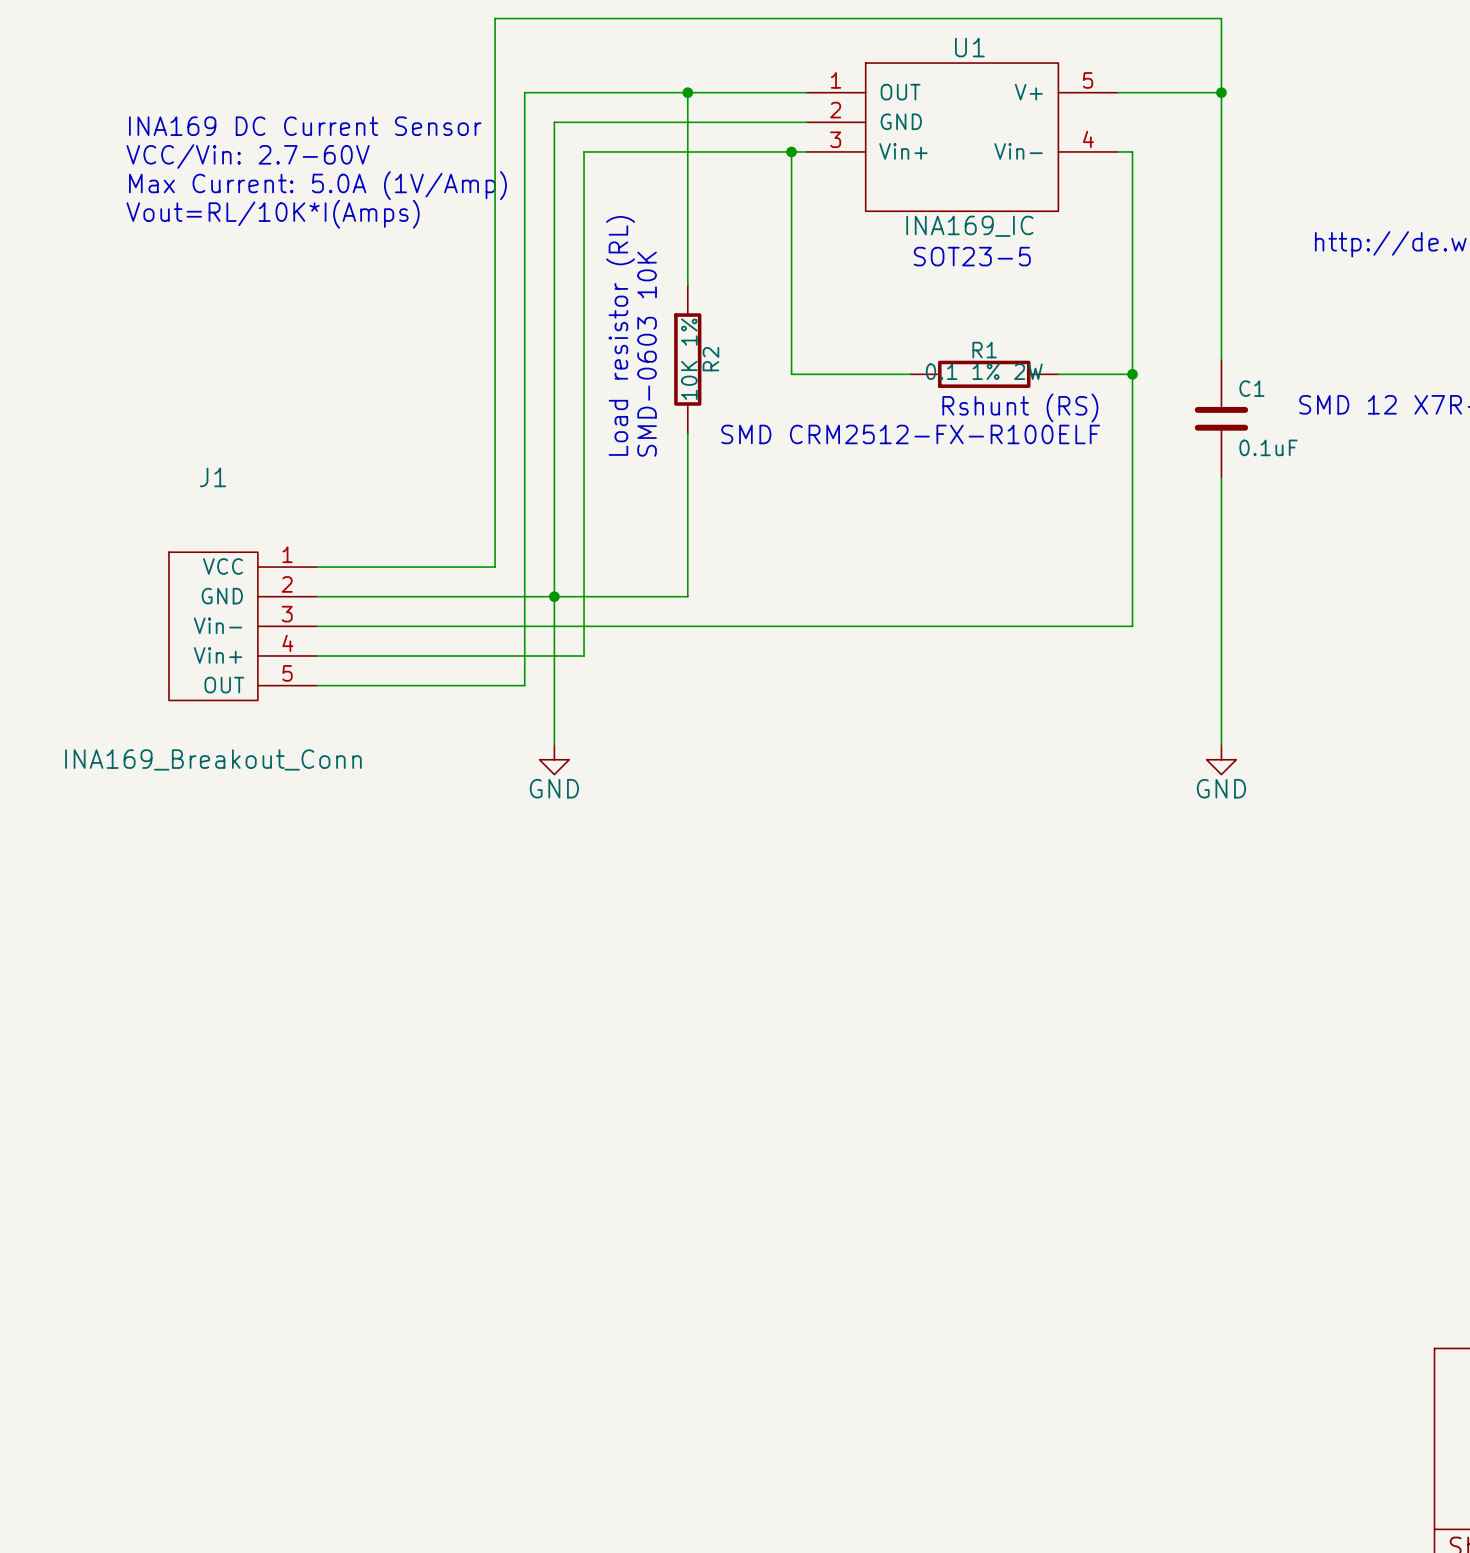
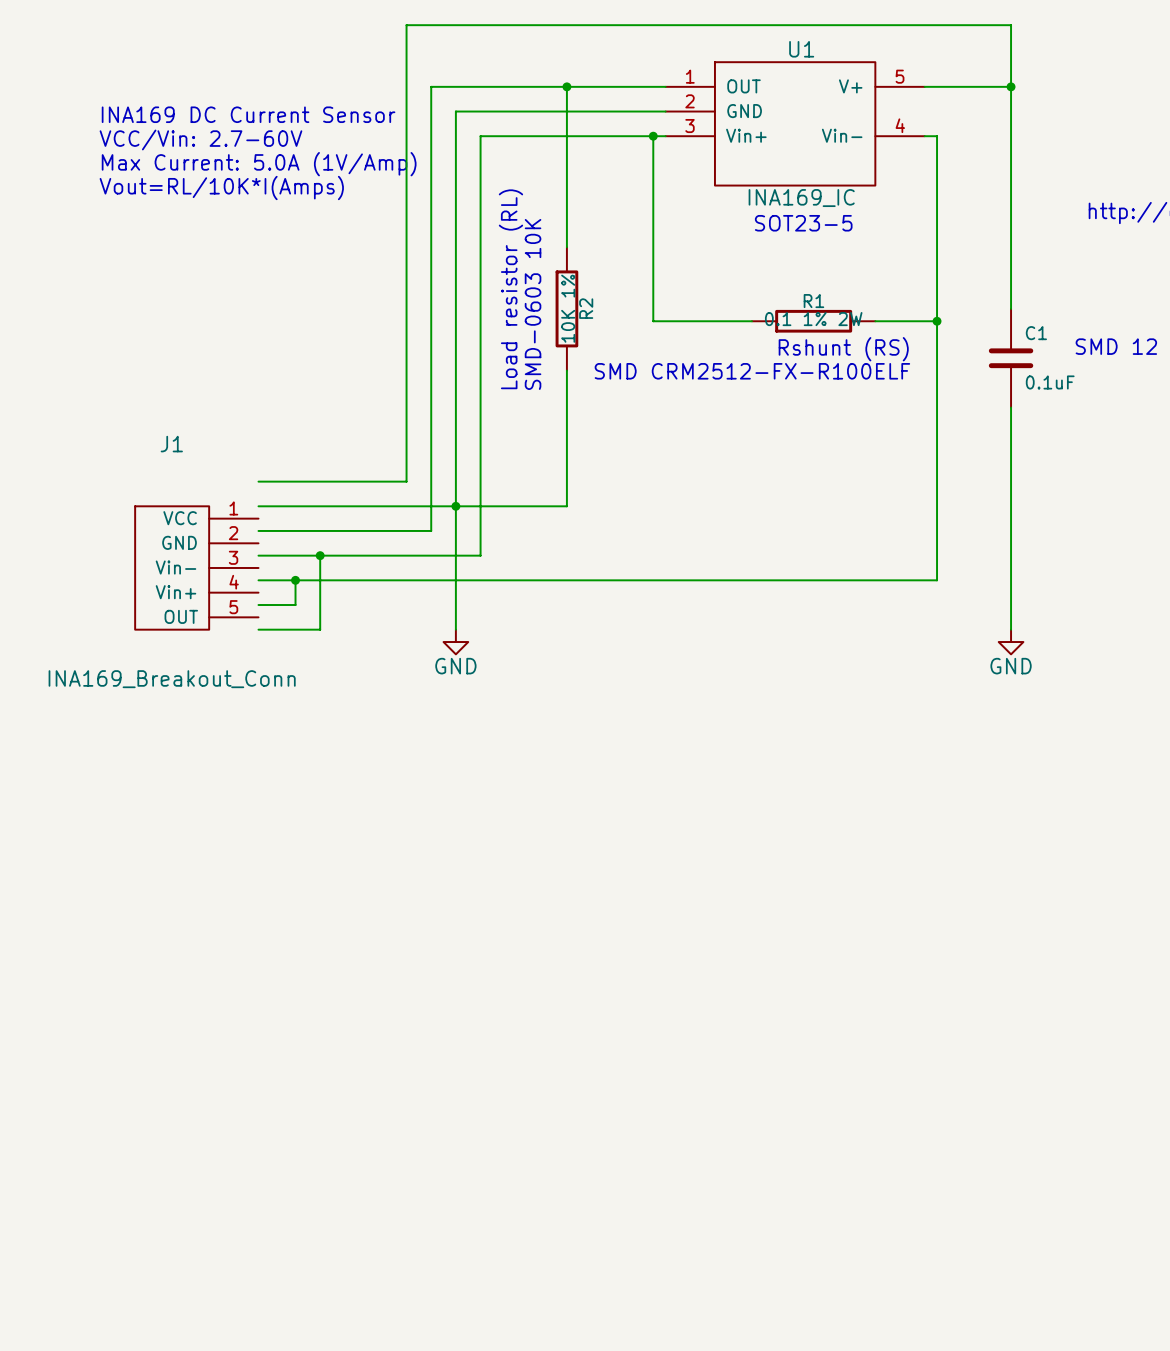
J1 position: (243, 626) -> (196, 567)
wire: (1132, 626) (524, 626) (524, 685) -> (937, 530) (937, 580) (431, 580)
wire: none -> (320, 555) (320, 629) (258, 629)
junction: none -> (320, 555)
wire: none -> (295, 580) (295, 605) (258, 605)
junction: none -> (295, 580)

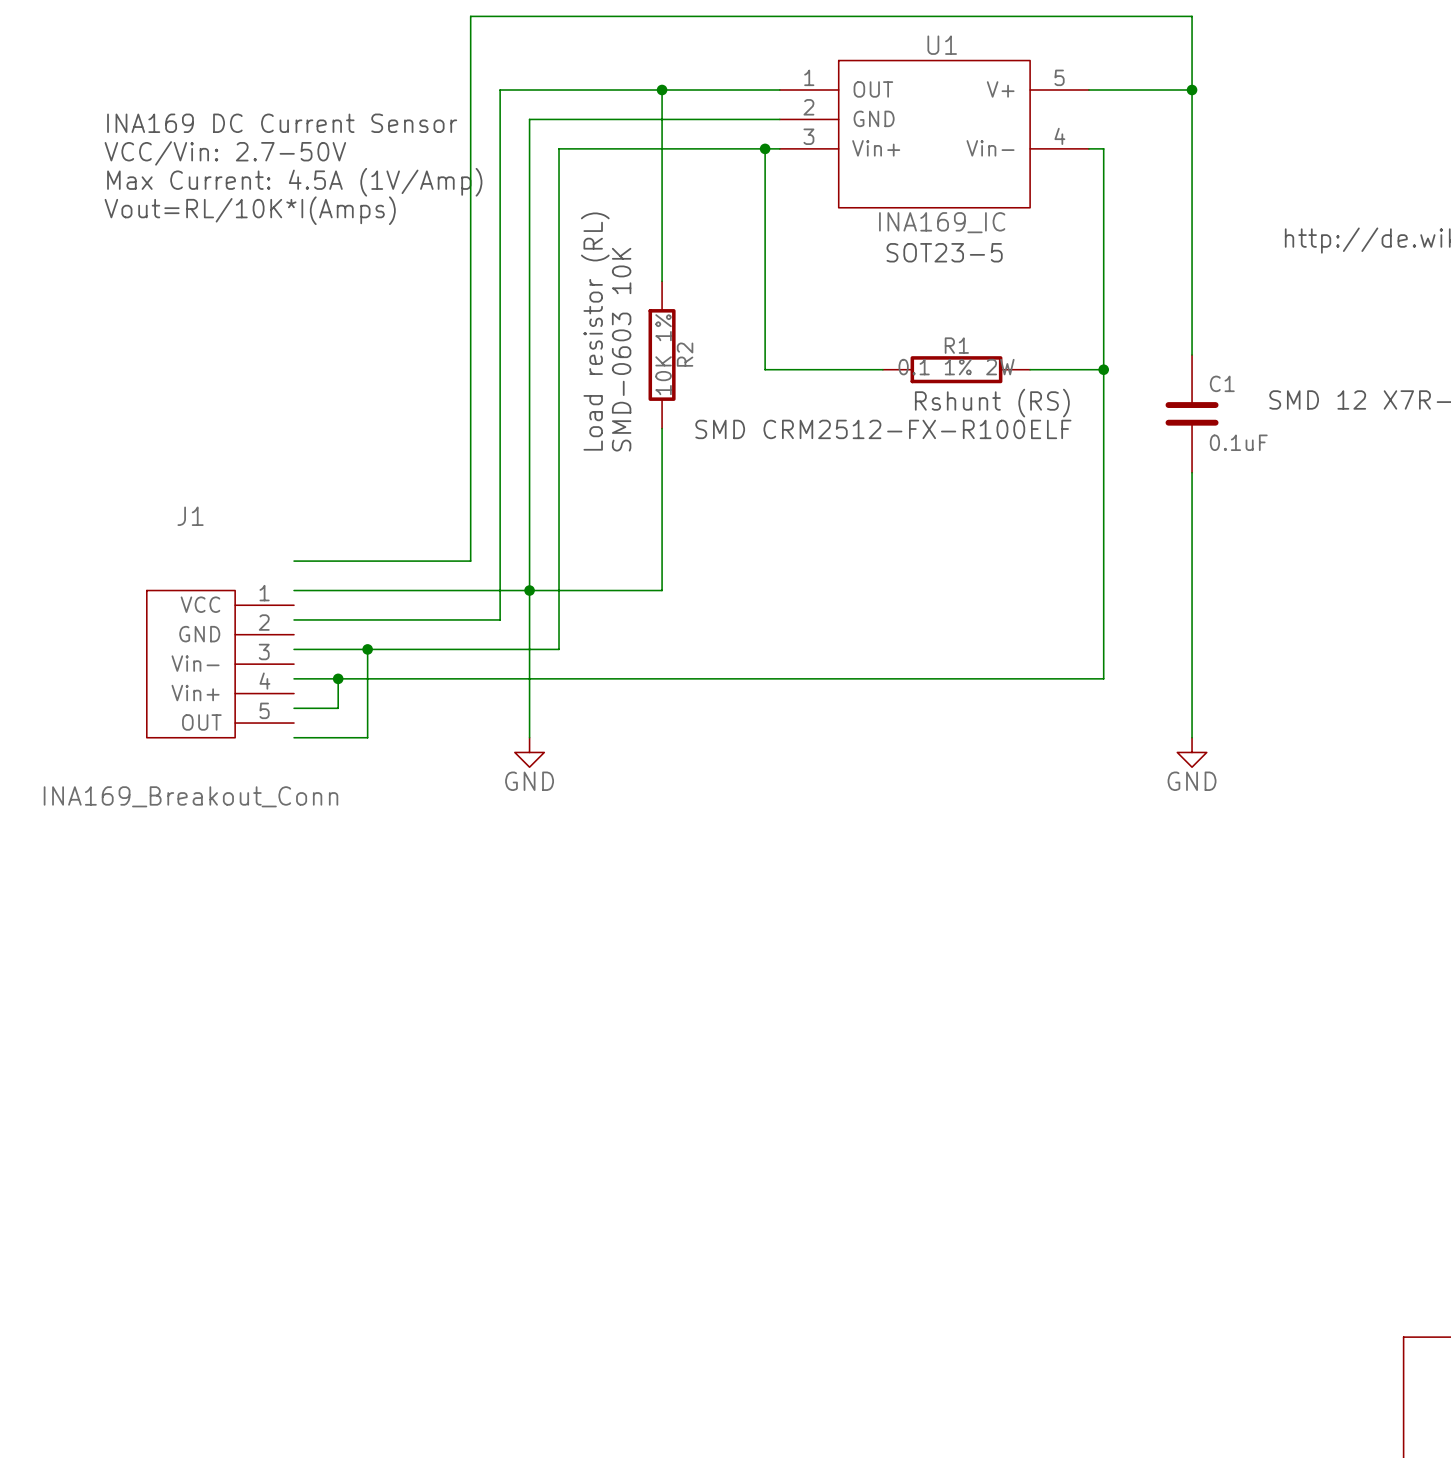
text: VCC/Vin: 2.7-60V (200, 139) -> VCC/Vin: 2.7-50V (225, 153)
text: Max Current: 5.0A (1V/Amp) (259, 164) -> Max Current: 4.5A (1V/Amp) (294, 182)

